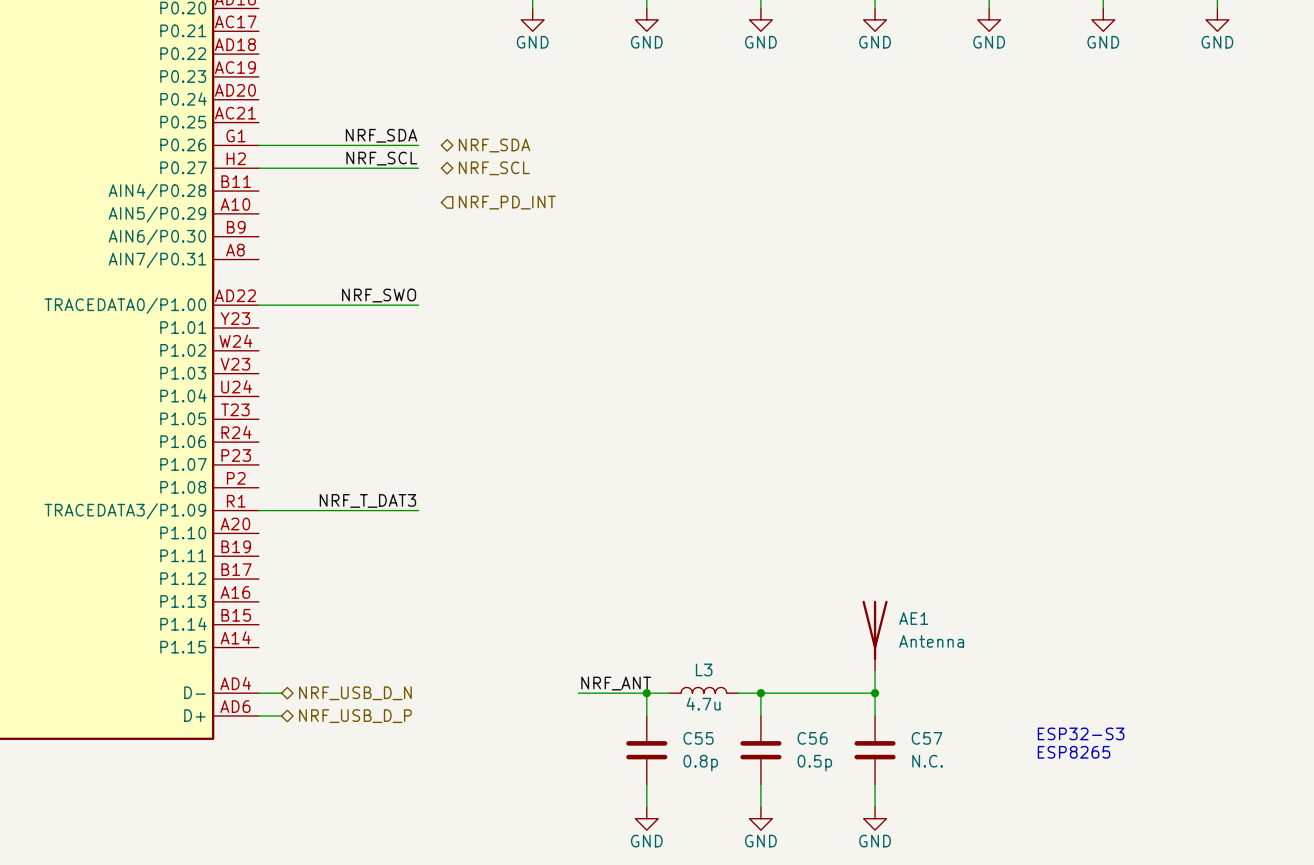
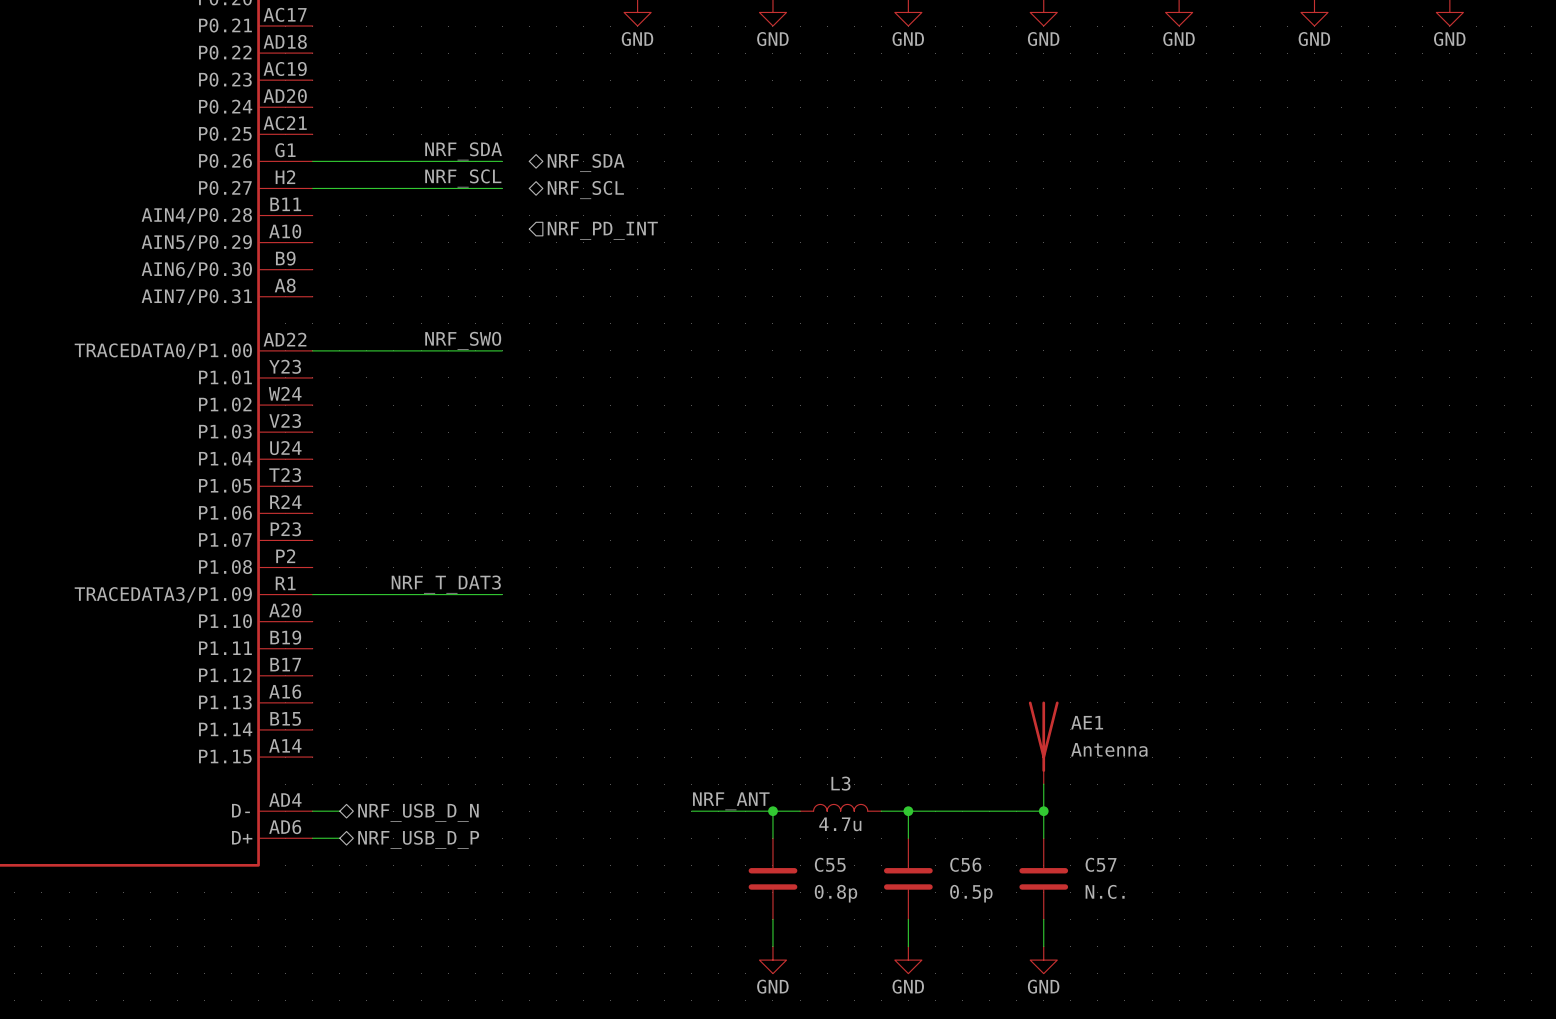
text: ESP32-S3 (1081, 733) -> none
text: ESP8265 (1074, 752) -> none

